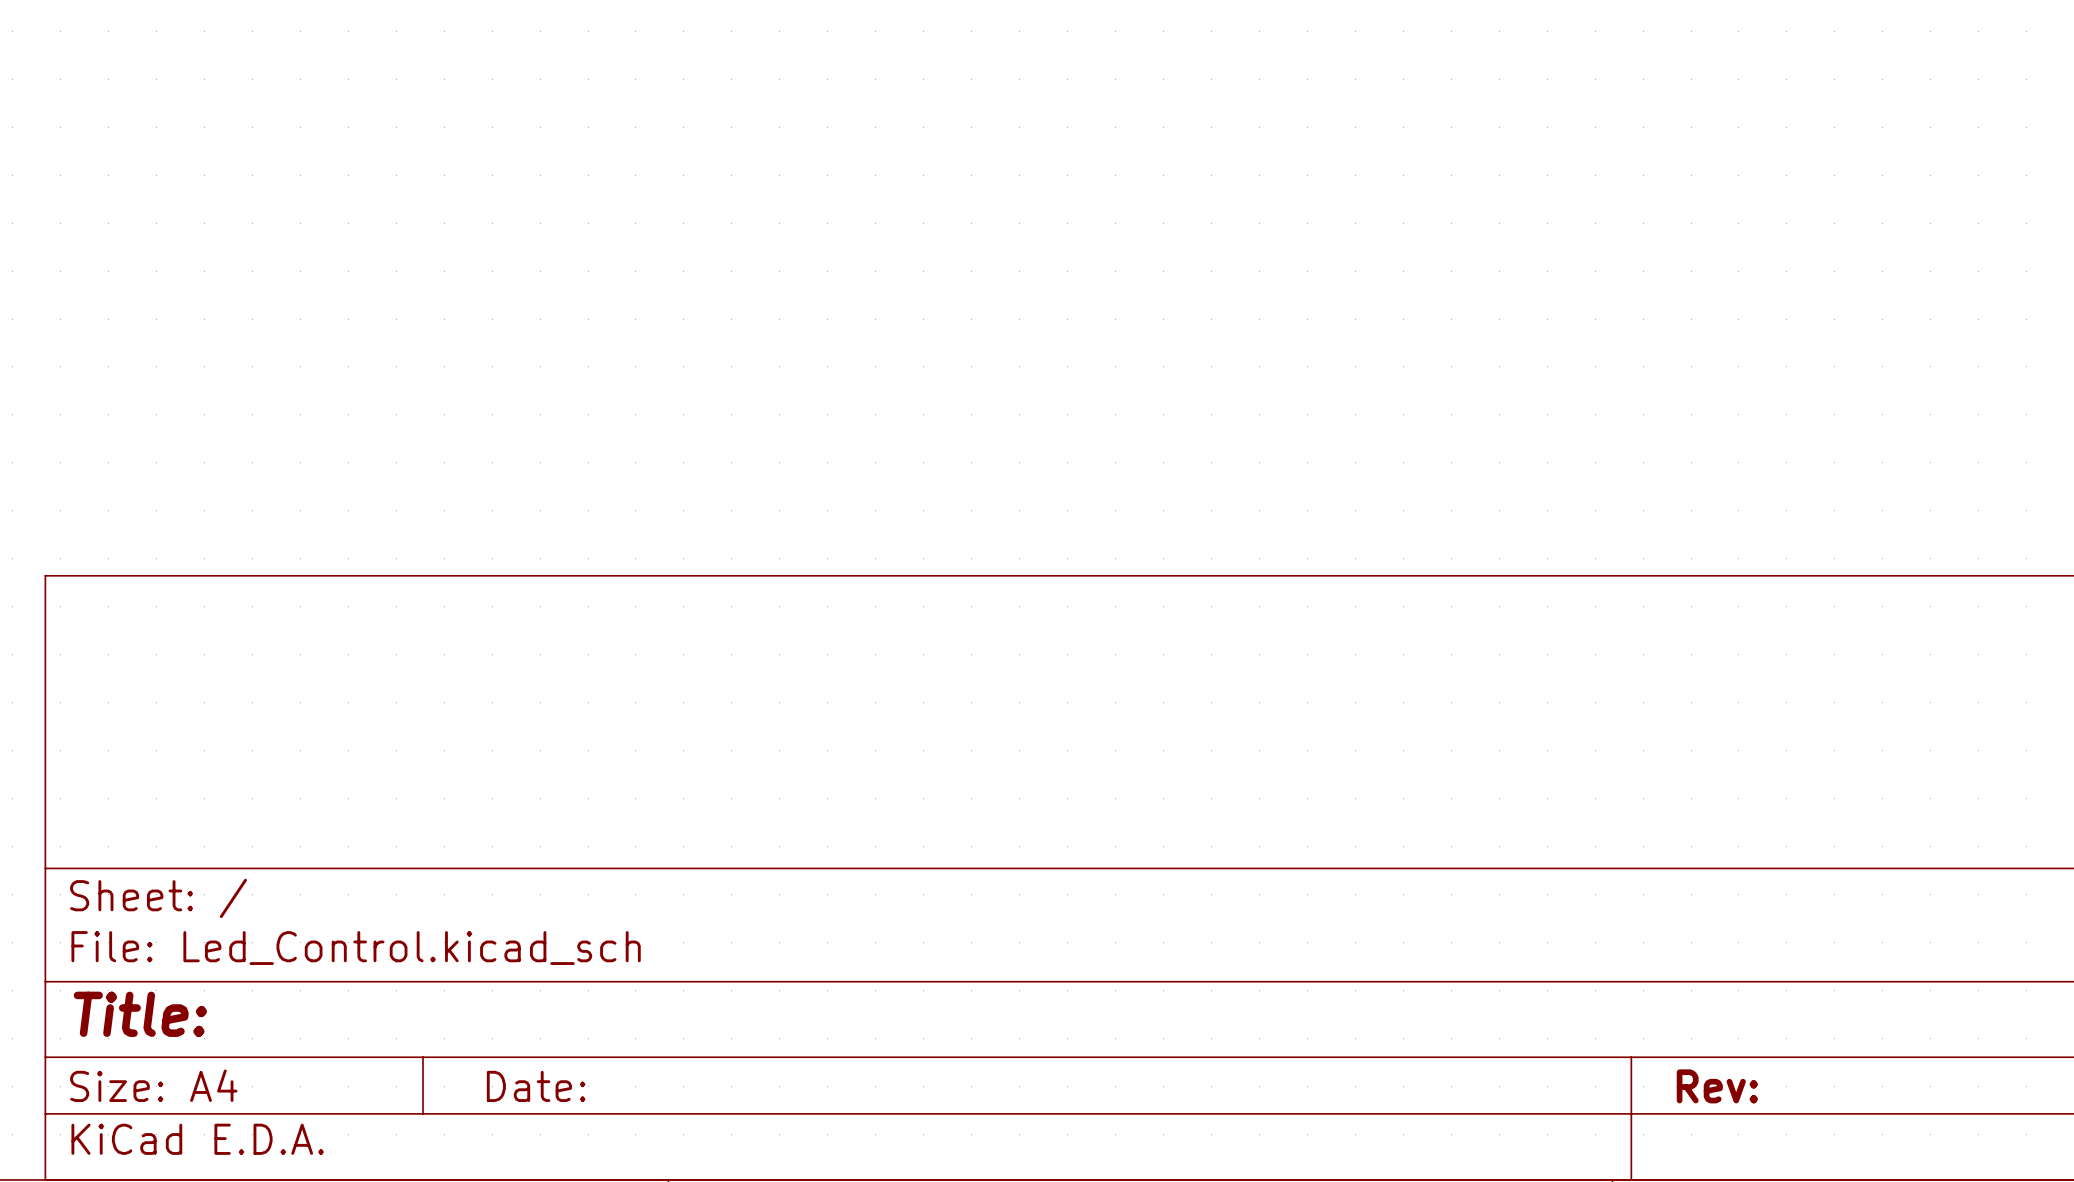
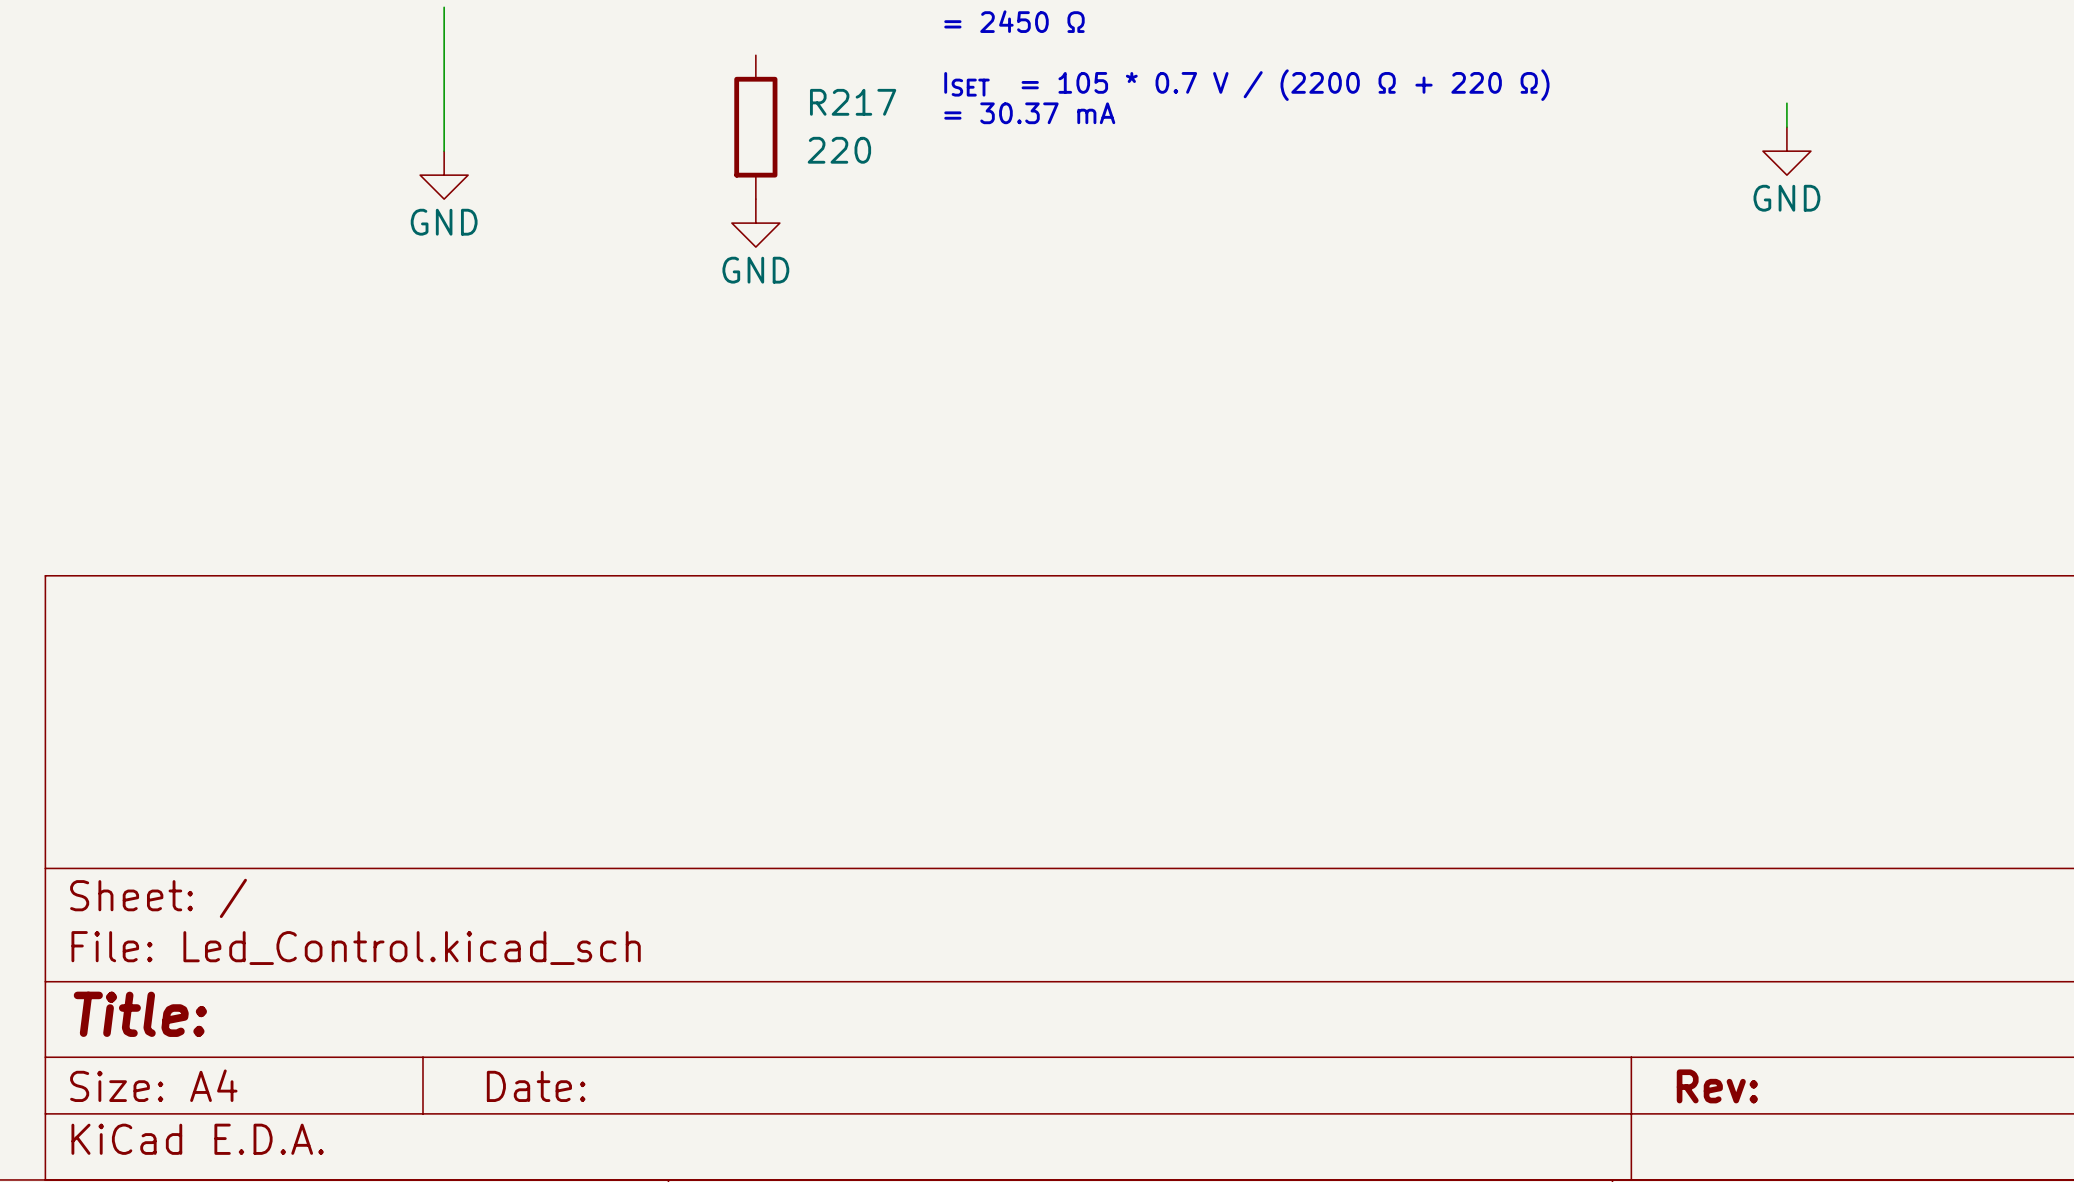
wire: none -> (444, 7) (444, 151)
text: none -> = 2450 Ω (1014, 21)
text: none -> ISET = 105 * 0.7 V / (2200 Ω + 220 Ω) (1246, 85)
wire: none -> (1786, 103) (1786, 127)
text: none -> = 30.37 mA (1029, 113)
R217: none -> 220 (755, 127)
power symbol: none -> GND (1786, 151)
power symbol: none -> GND (444, 175)
power symbol: none -> GND (755, 223)

